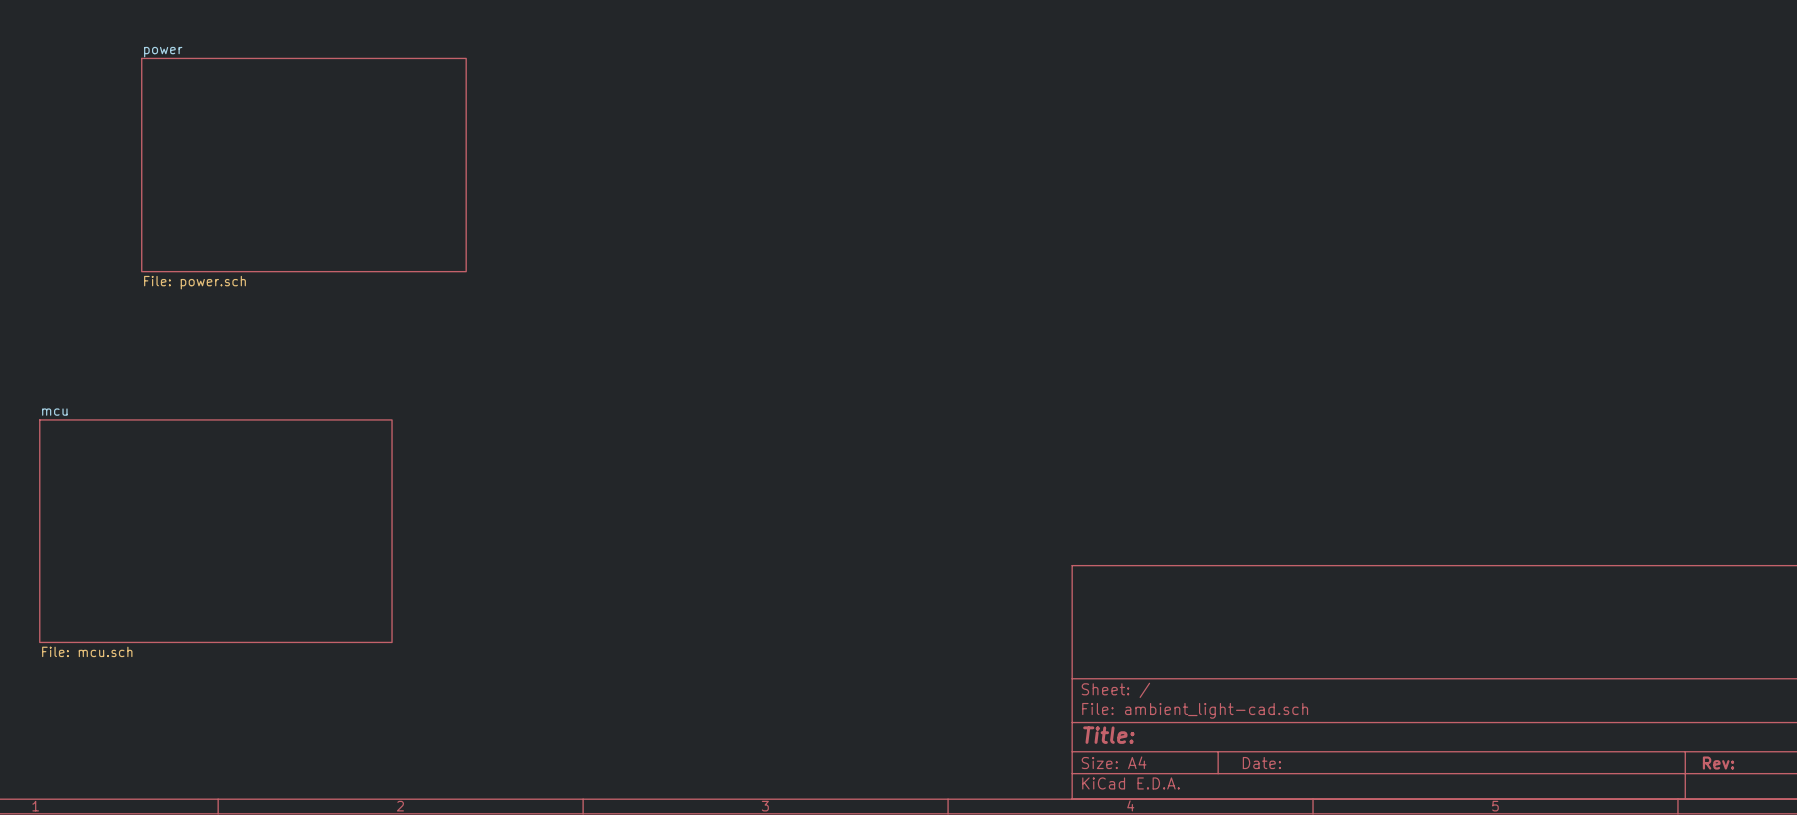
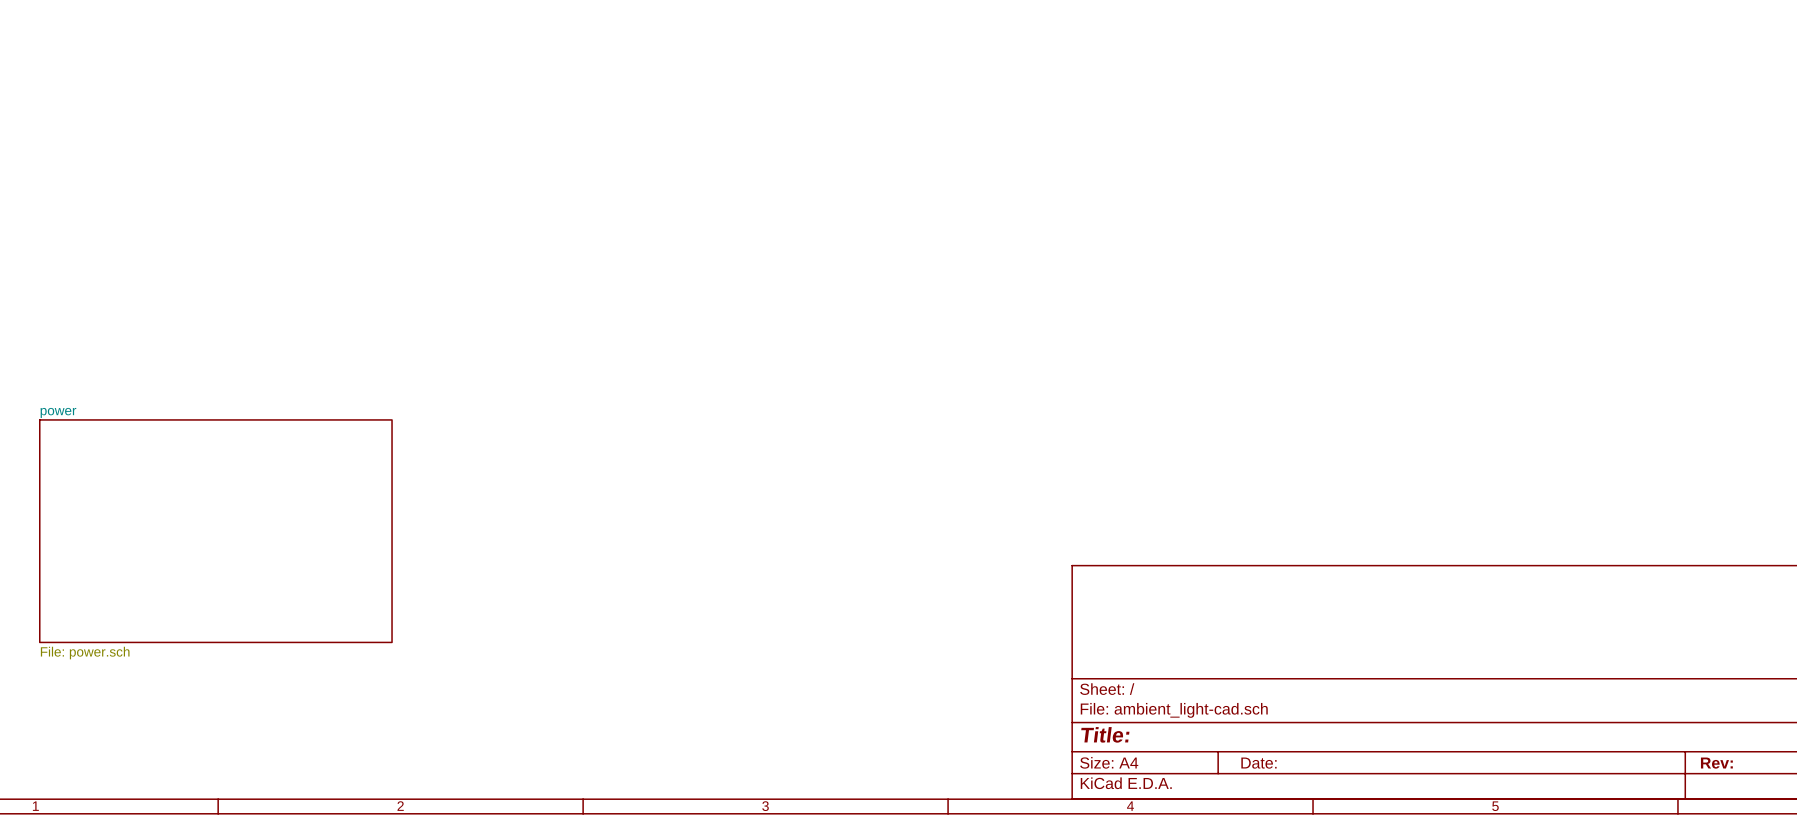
sheet power: File: power.sch (303, 165) -> none
sheet mcu name: mcu (54, 412) -> power (58, 412)
sheet mcu value: File: mcu.sch (87, 651) -> File: power.sch (85, 653)

